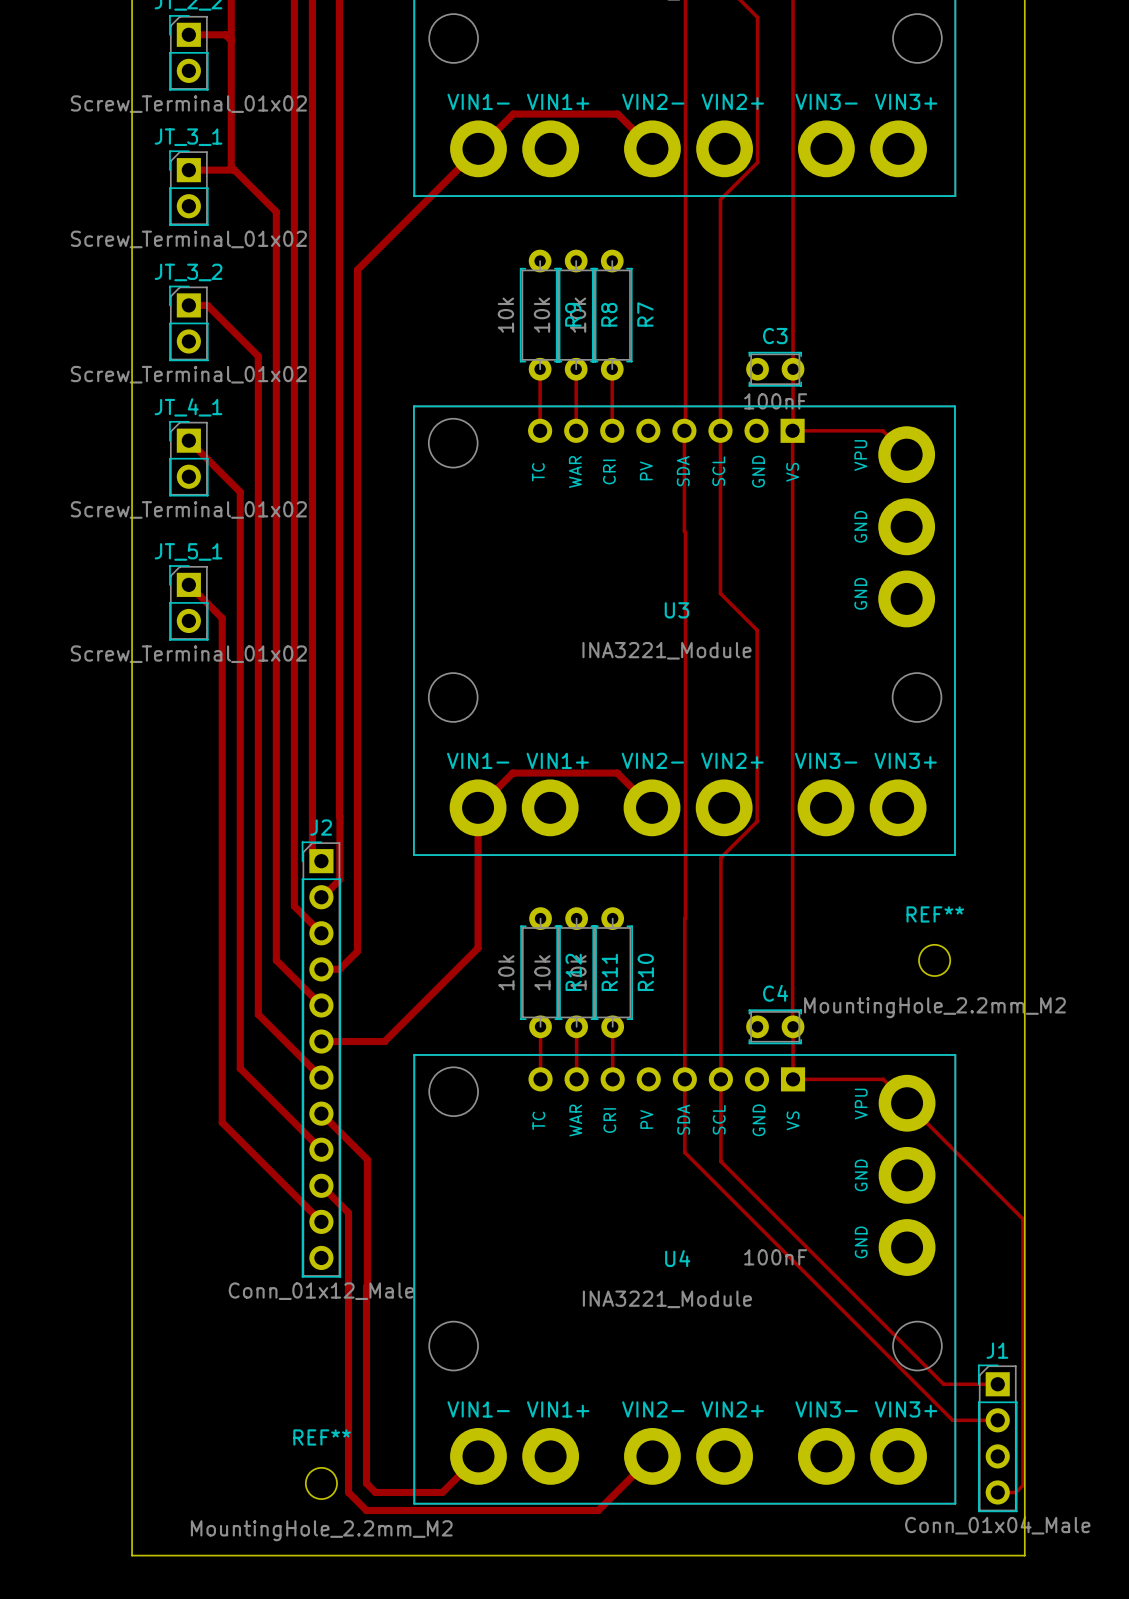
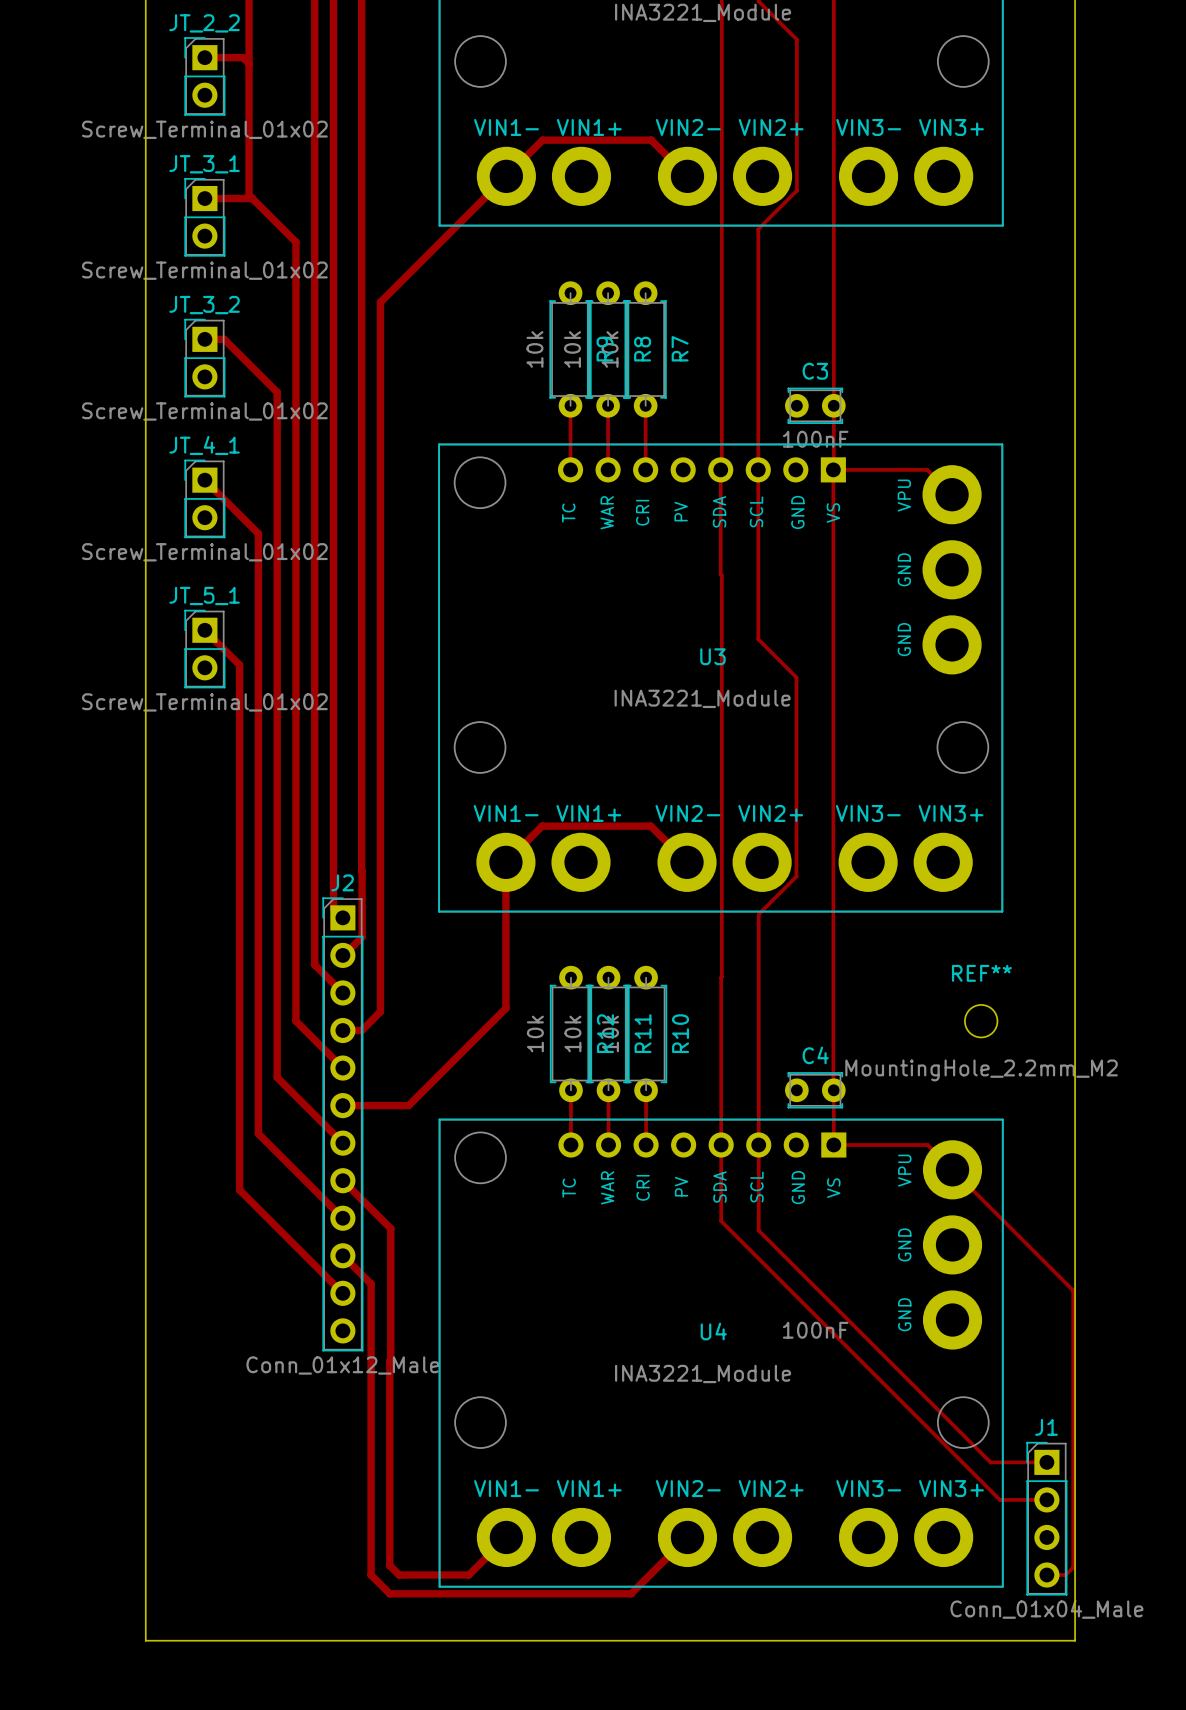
REF**: MountingHole_2.2mm_M2 (321, 1483) -> none

